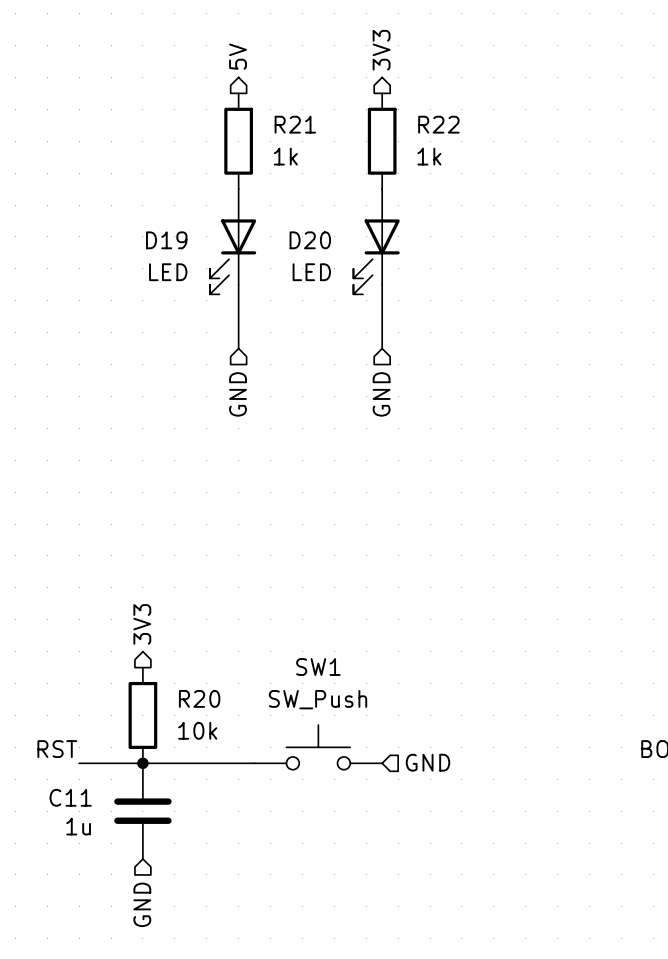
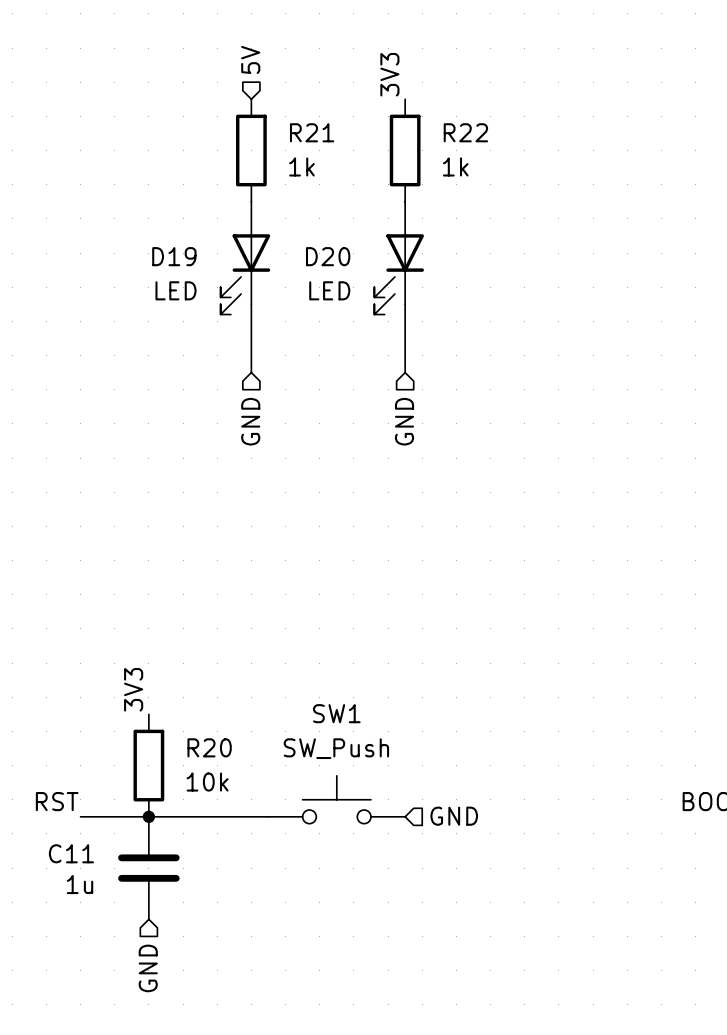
hierarchical label: 3V3 (381, 50) -> none
hierarchical label shape: output (238, 56) -> input (250, 59)
label: none -> 3V3 (389, 74)
hierarchical label: 3V3 (142, 624) -> none
label: none -> 3V3 (133, 689)

